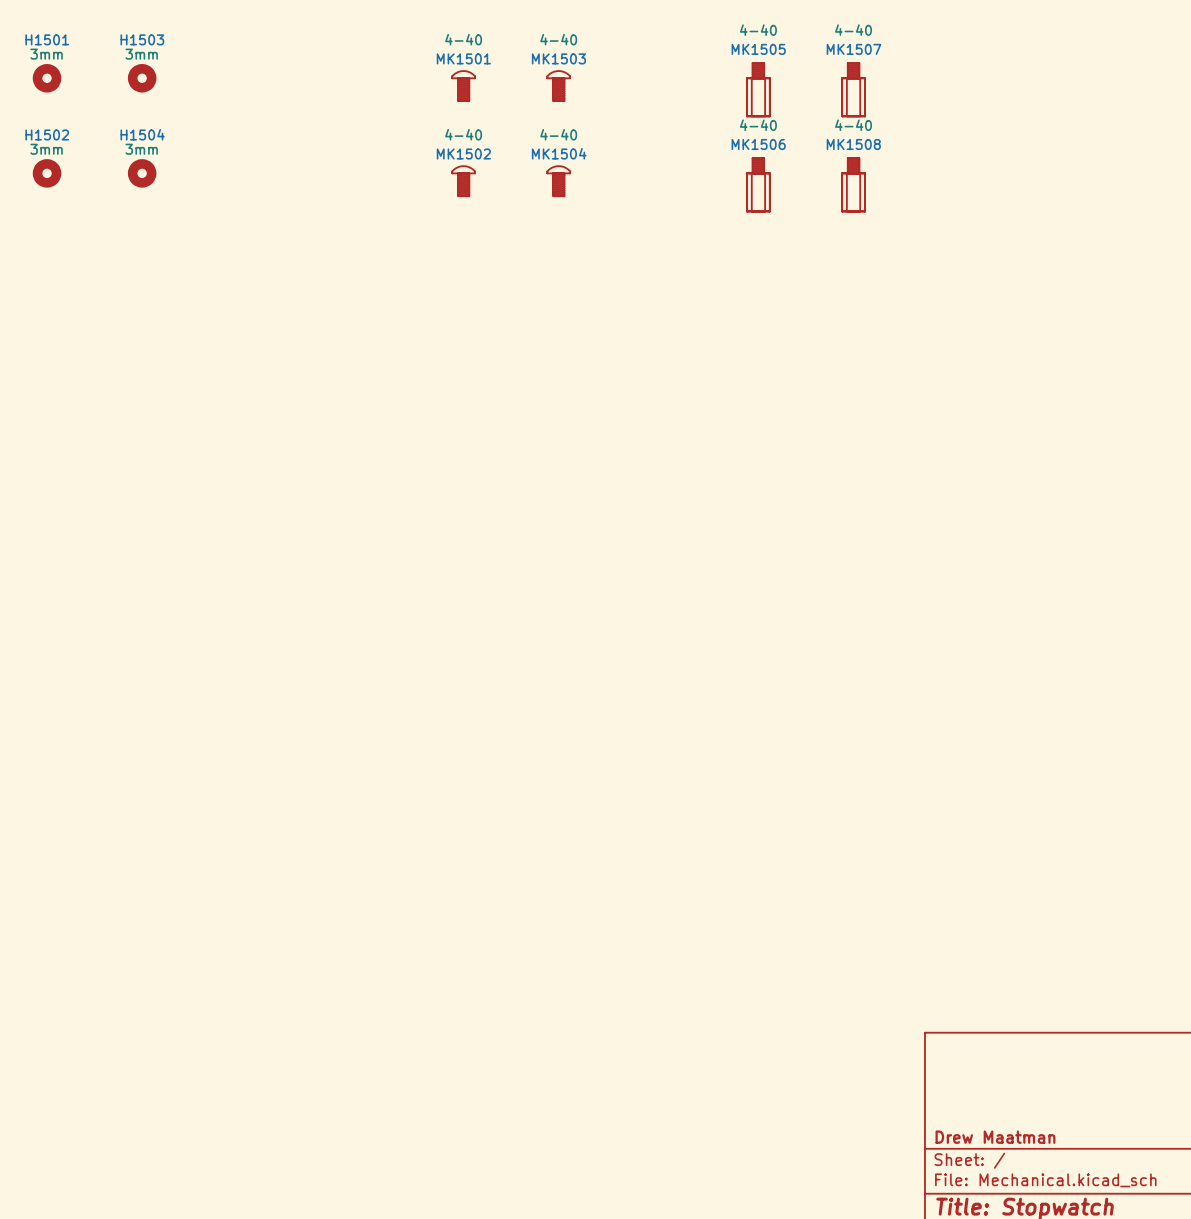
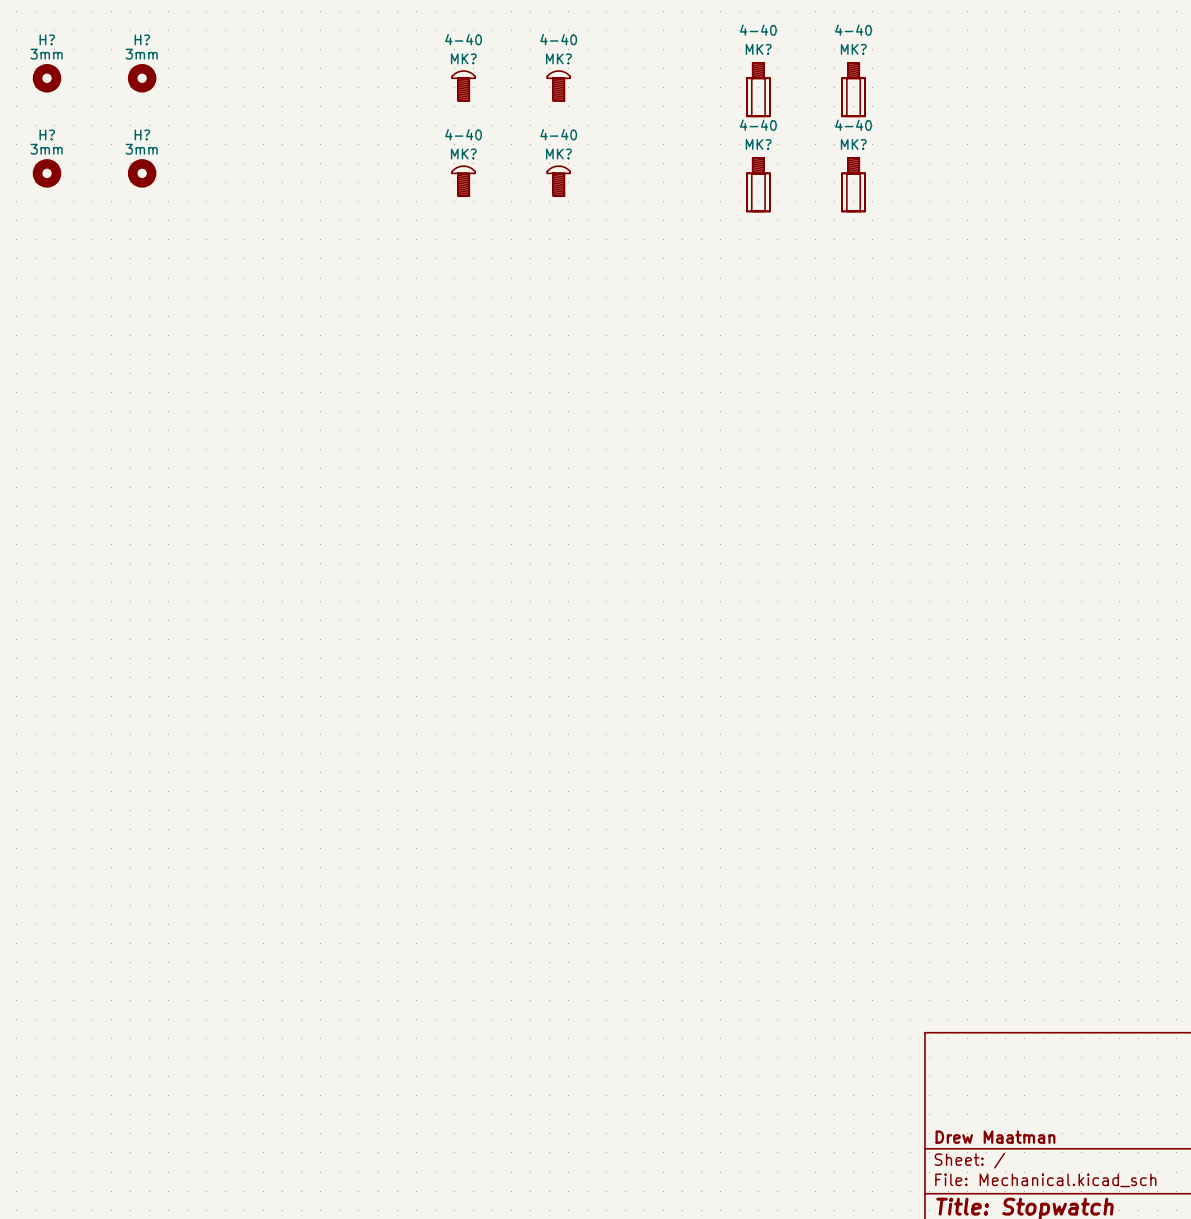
H1501 name: H1501 (47, 39) -> H? (47, 39)
H1503 name: H1503 (142, 39) -> H? (142, 39)
MK1505 name: MK1505 (758, 49) -> MK? (758, 49)
MK1507 name: MK1507 (853, 49) -> MK? (853, 49)
MK1501 name: MK1501 (463, 58) -> MK? (463, 58)
MK1503 name: MK1503 (558, 58) -> MK? (558, 58)
H1502 name: H1502 (47, 134) -> H? (47, 134)
H1504 name: H1504 (142, 134) -> H? (142, 134)
MK1506 name: MK1506 (758, 144) -> MK? (758, 144)
MK1508 name: MK1508 (853, 144) -> MK? (853, 144)
MK1504 name: MK1504 (559, 153) -> MK? (558, 154)
MK1502 name: MK1502 (463, 154) -> MK? (463, 154)

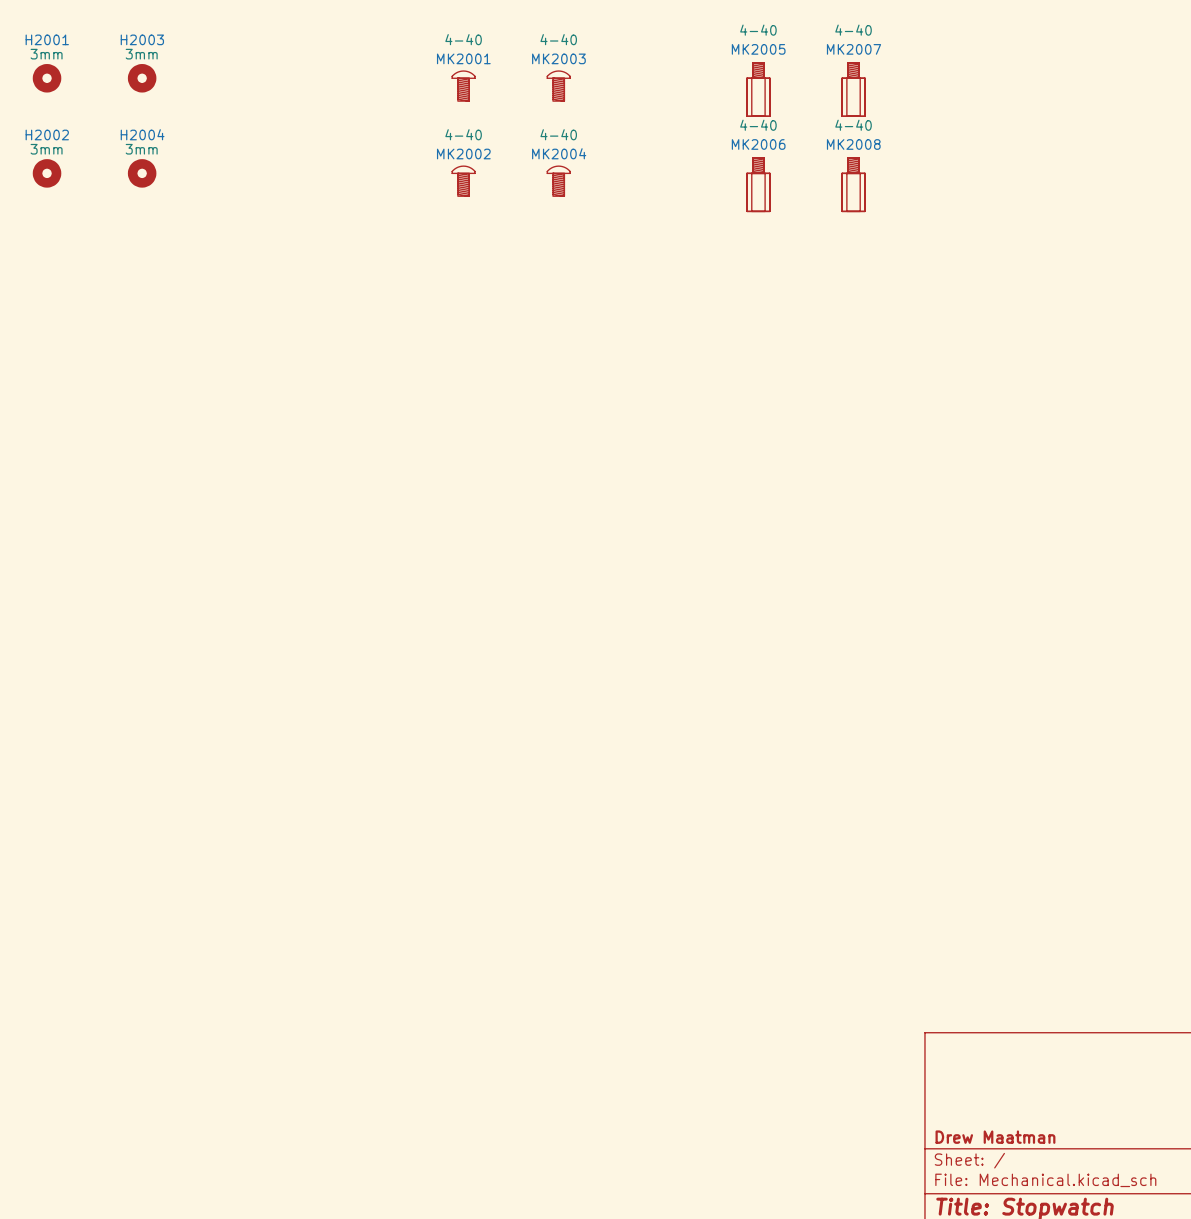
H? name: H? (47, 39) -> H2001 (47, 39)
H? name: H? (142, 39) -> H2003 (142, 39)
MK? name: MK? (758, 49) -> MK2005 (758, 49)
MK? name: MK? (853, 49) -> MK2007 (853, 49)
MK? name: MK? (463, 58) -> MK2001 (463, 58)
MK? name: MK? (558, 58) -> MK2003 (558, 58)
H? name: H? (47, 134) -> H2002 (47, 134)
H? name: H? (142, 134) -> H2004 (142, 134)
MK? name: MK? (758, 144) -> MK2006 (758, 144)
MK? name: MK? (853, 144) -> MK2008 (853, 144)
MK? name: MK? (463, 154) -> MK2002 (463, 154)
MK? name: MK? (558, 154) -> MK2004 (559, 153)

